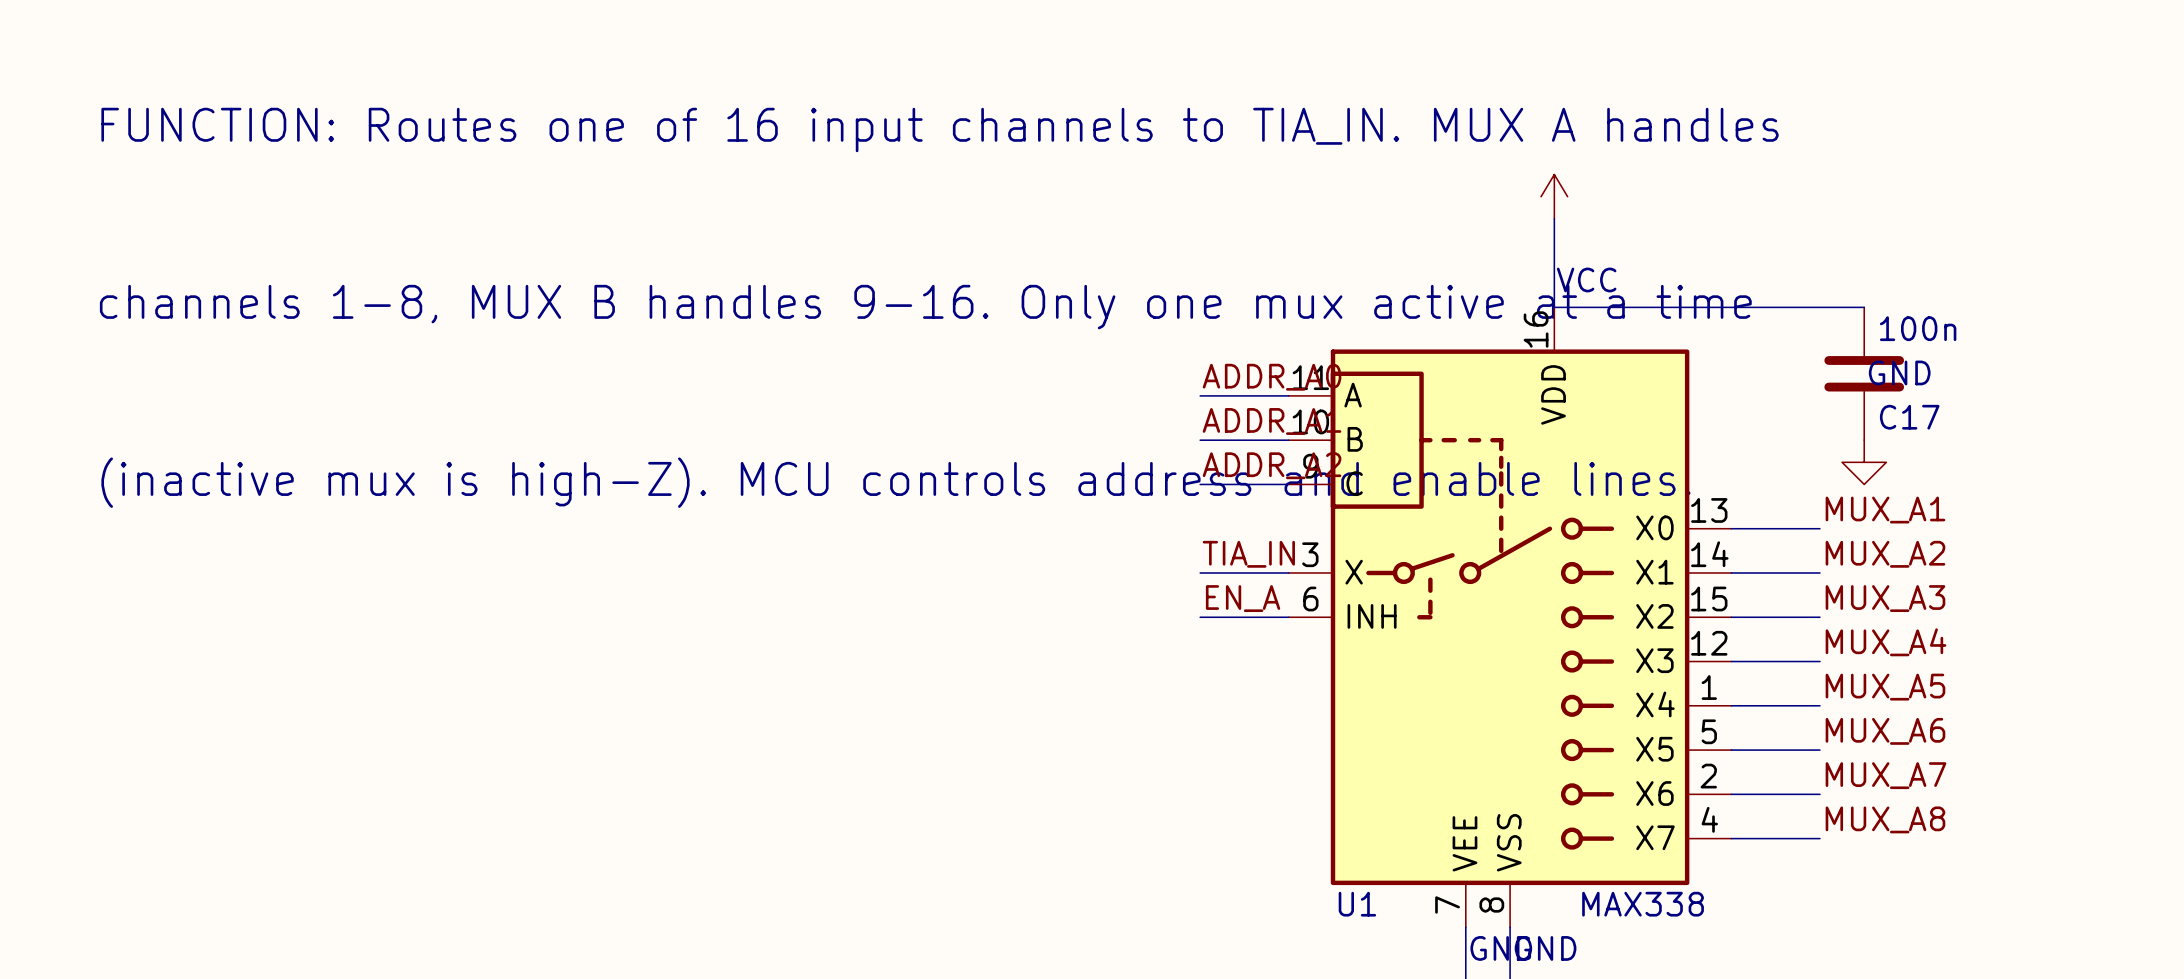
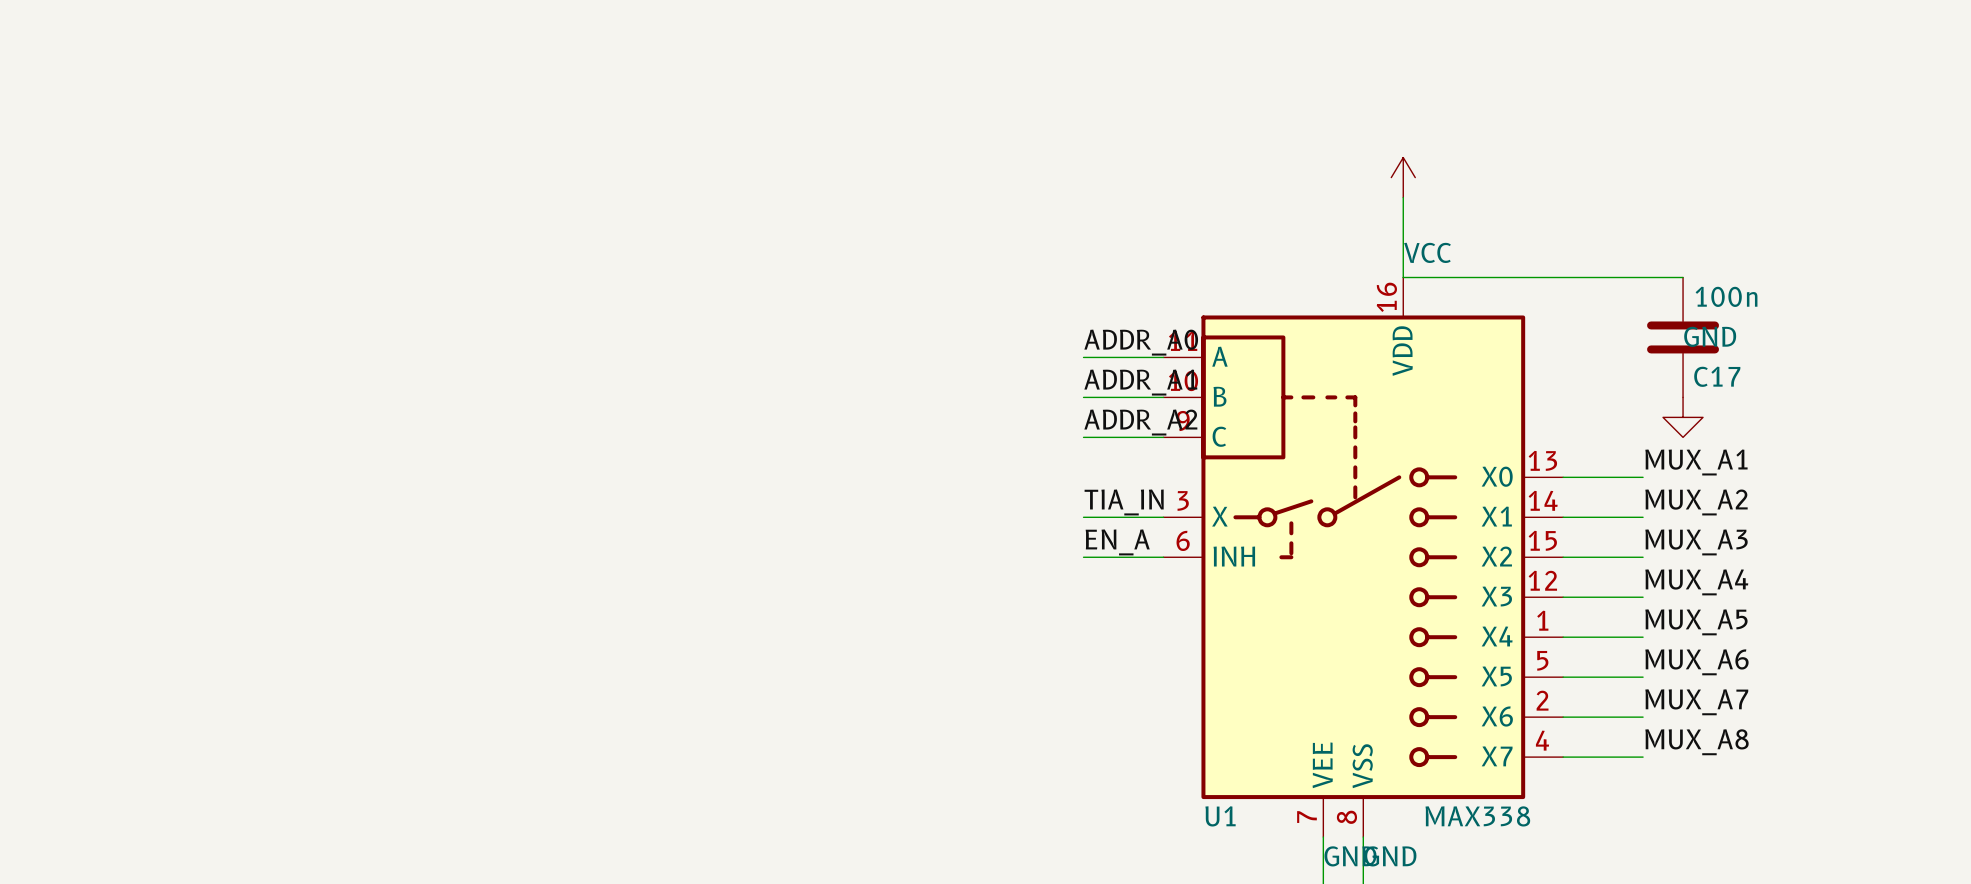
text: FUNCTION: Routes one of 16 input channels to TIA_IN. MUX A handles (940, 130) -> none
text: channels 1-8, MUX B handles 9-16. Only one mux active at a time (925, 307) -> none
text: (inactive mux is high-Z). MCU controls address and enable lines. (895, 482) -> none

